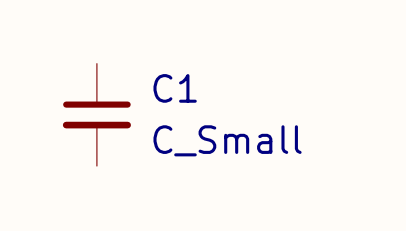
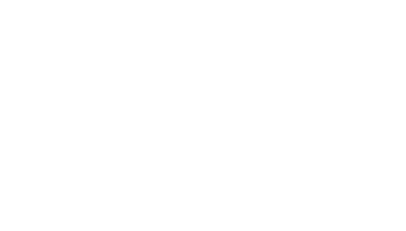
C1: C_Small (96, 114) -> none

